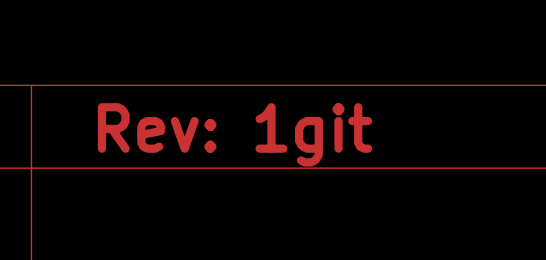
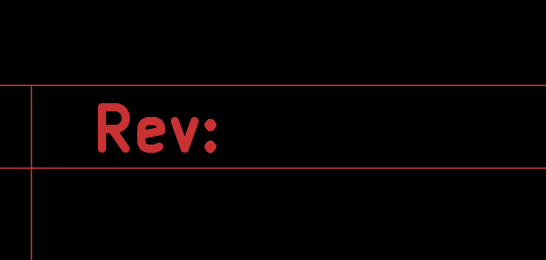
title block: Rev: 1git (235, 134) -> Rev: (157, 127)

